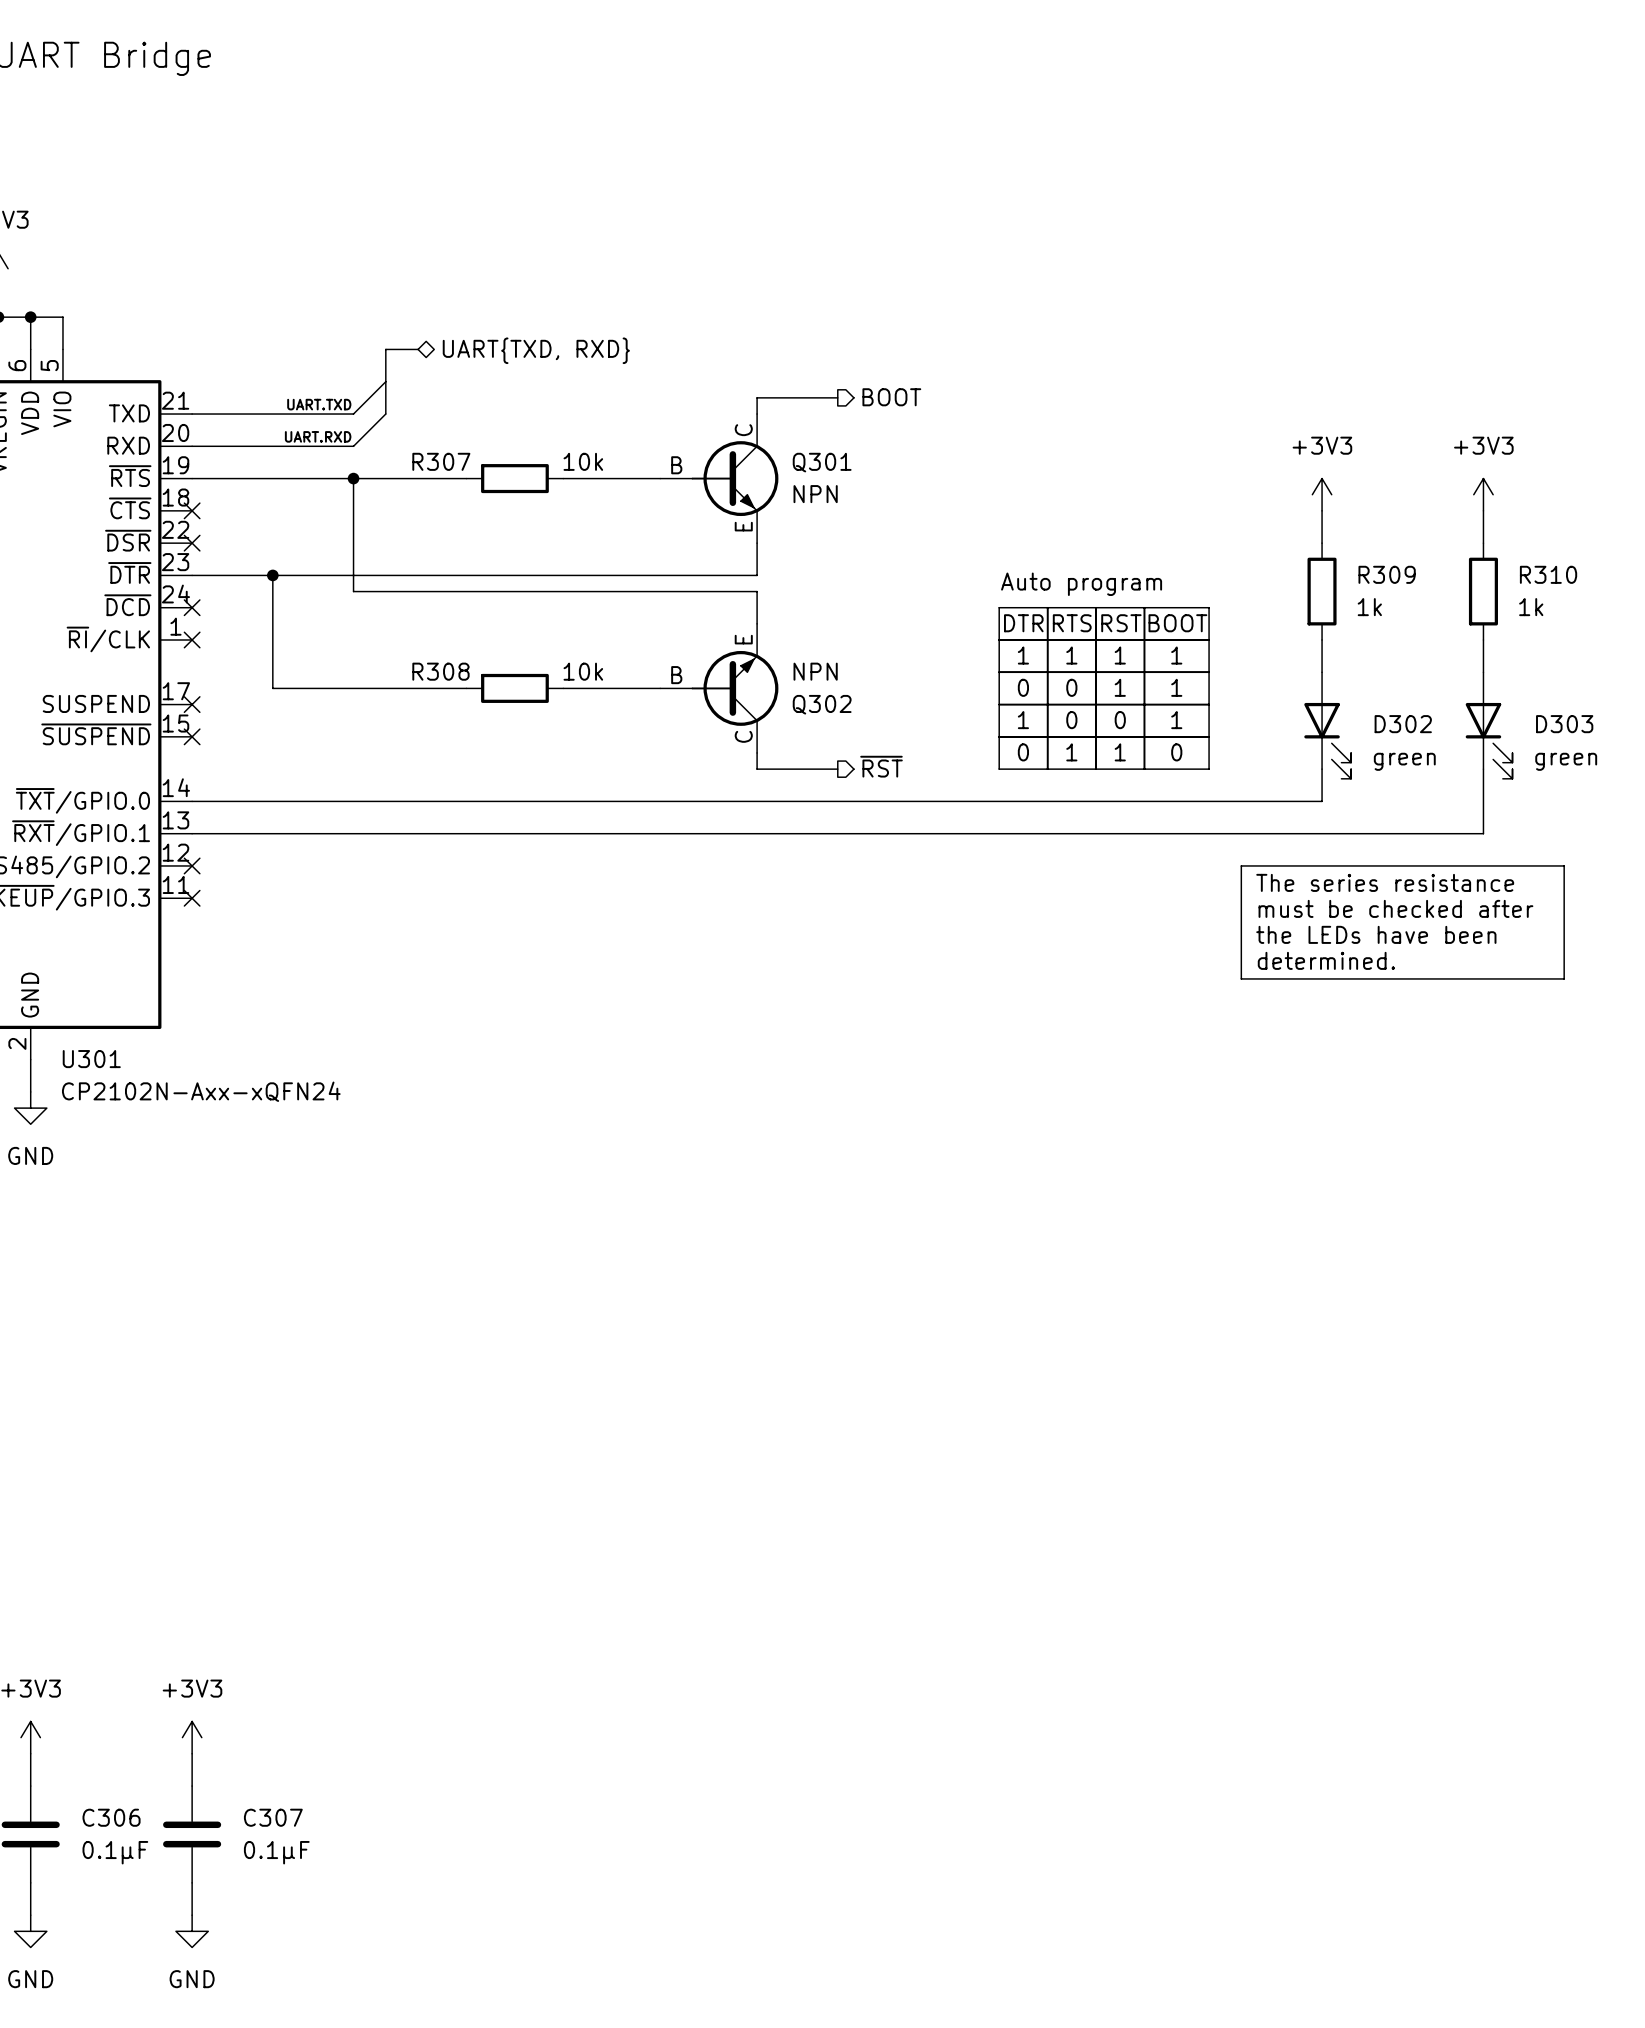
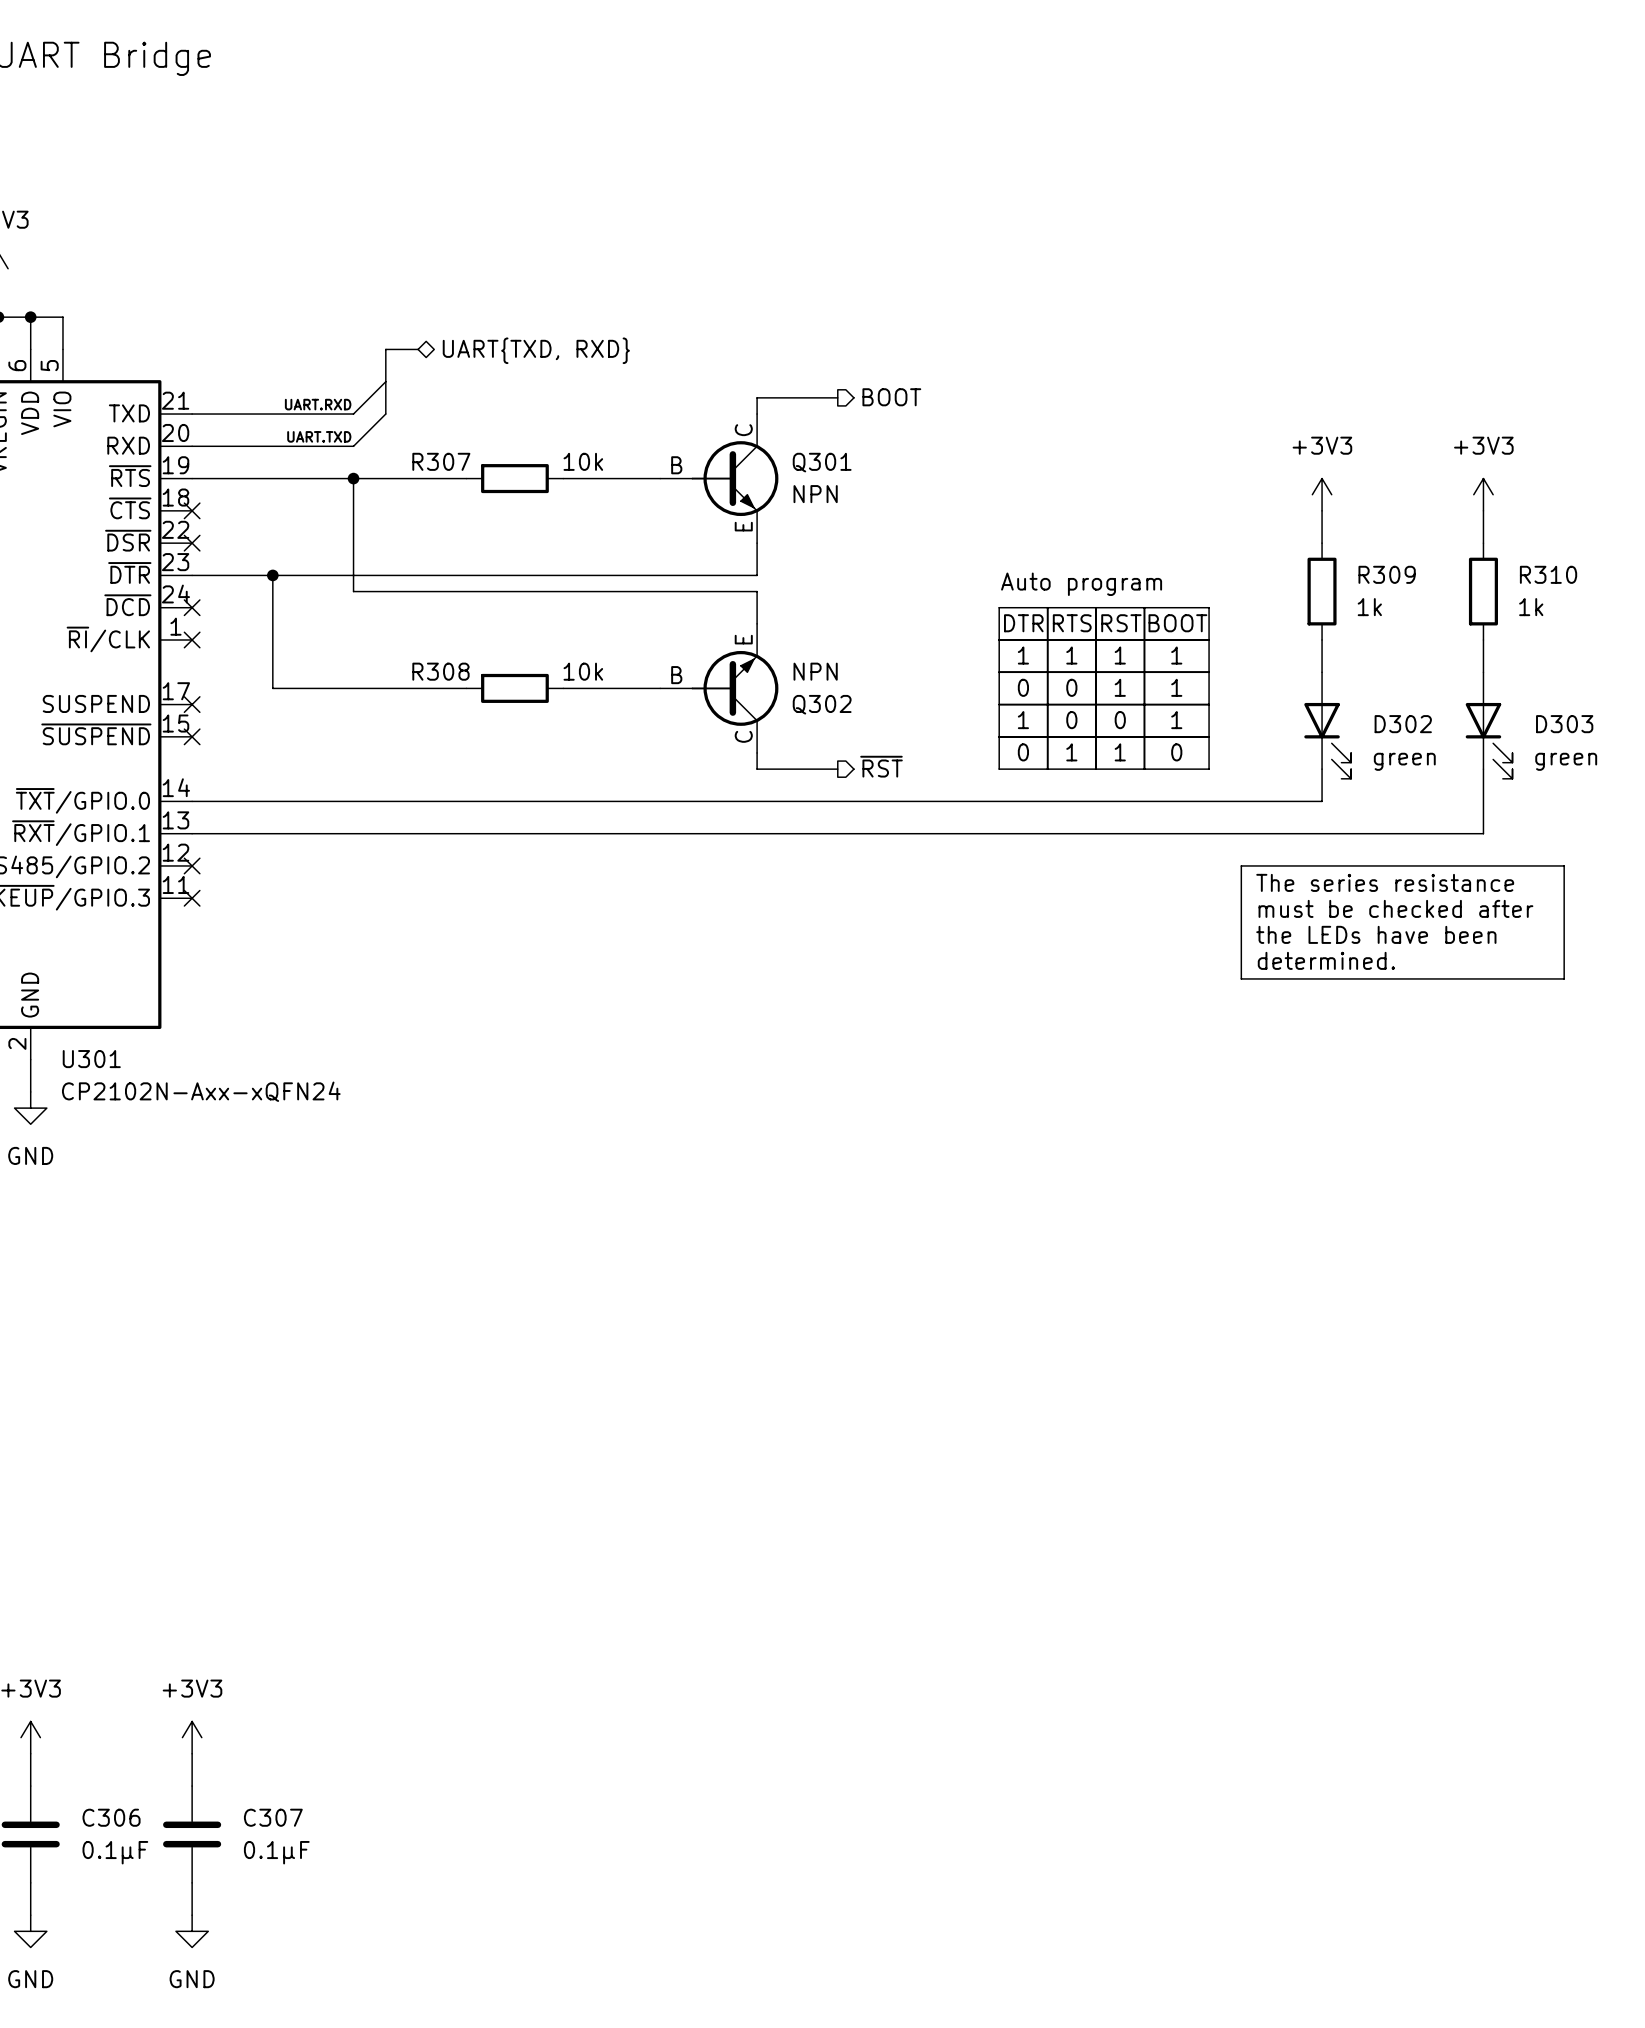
label: UART.TXD (319, 404) -> UART.RXD (318, 404)
label: UART.RXD (318, 436) -> UART.TXD (319, 436)

